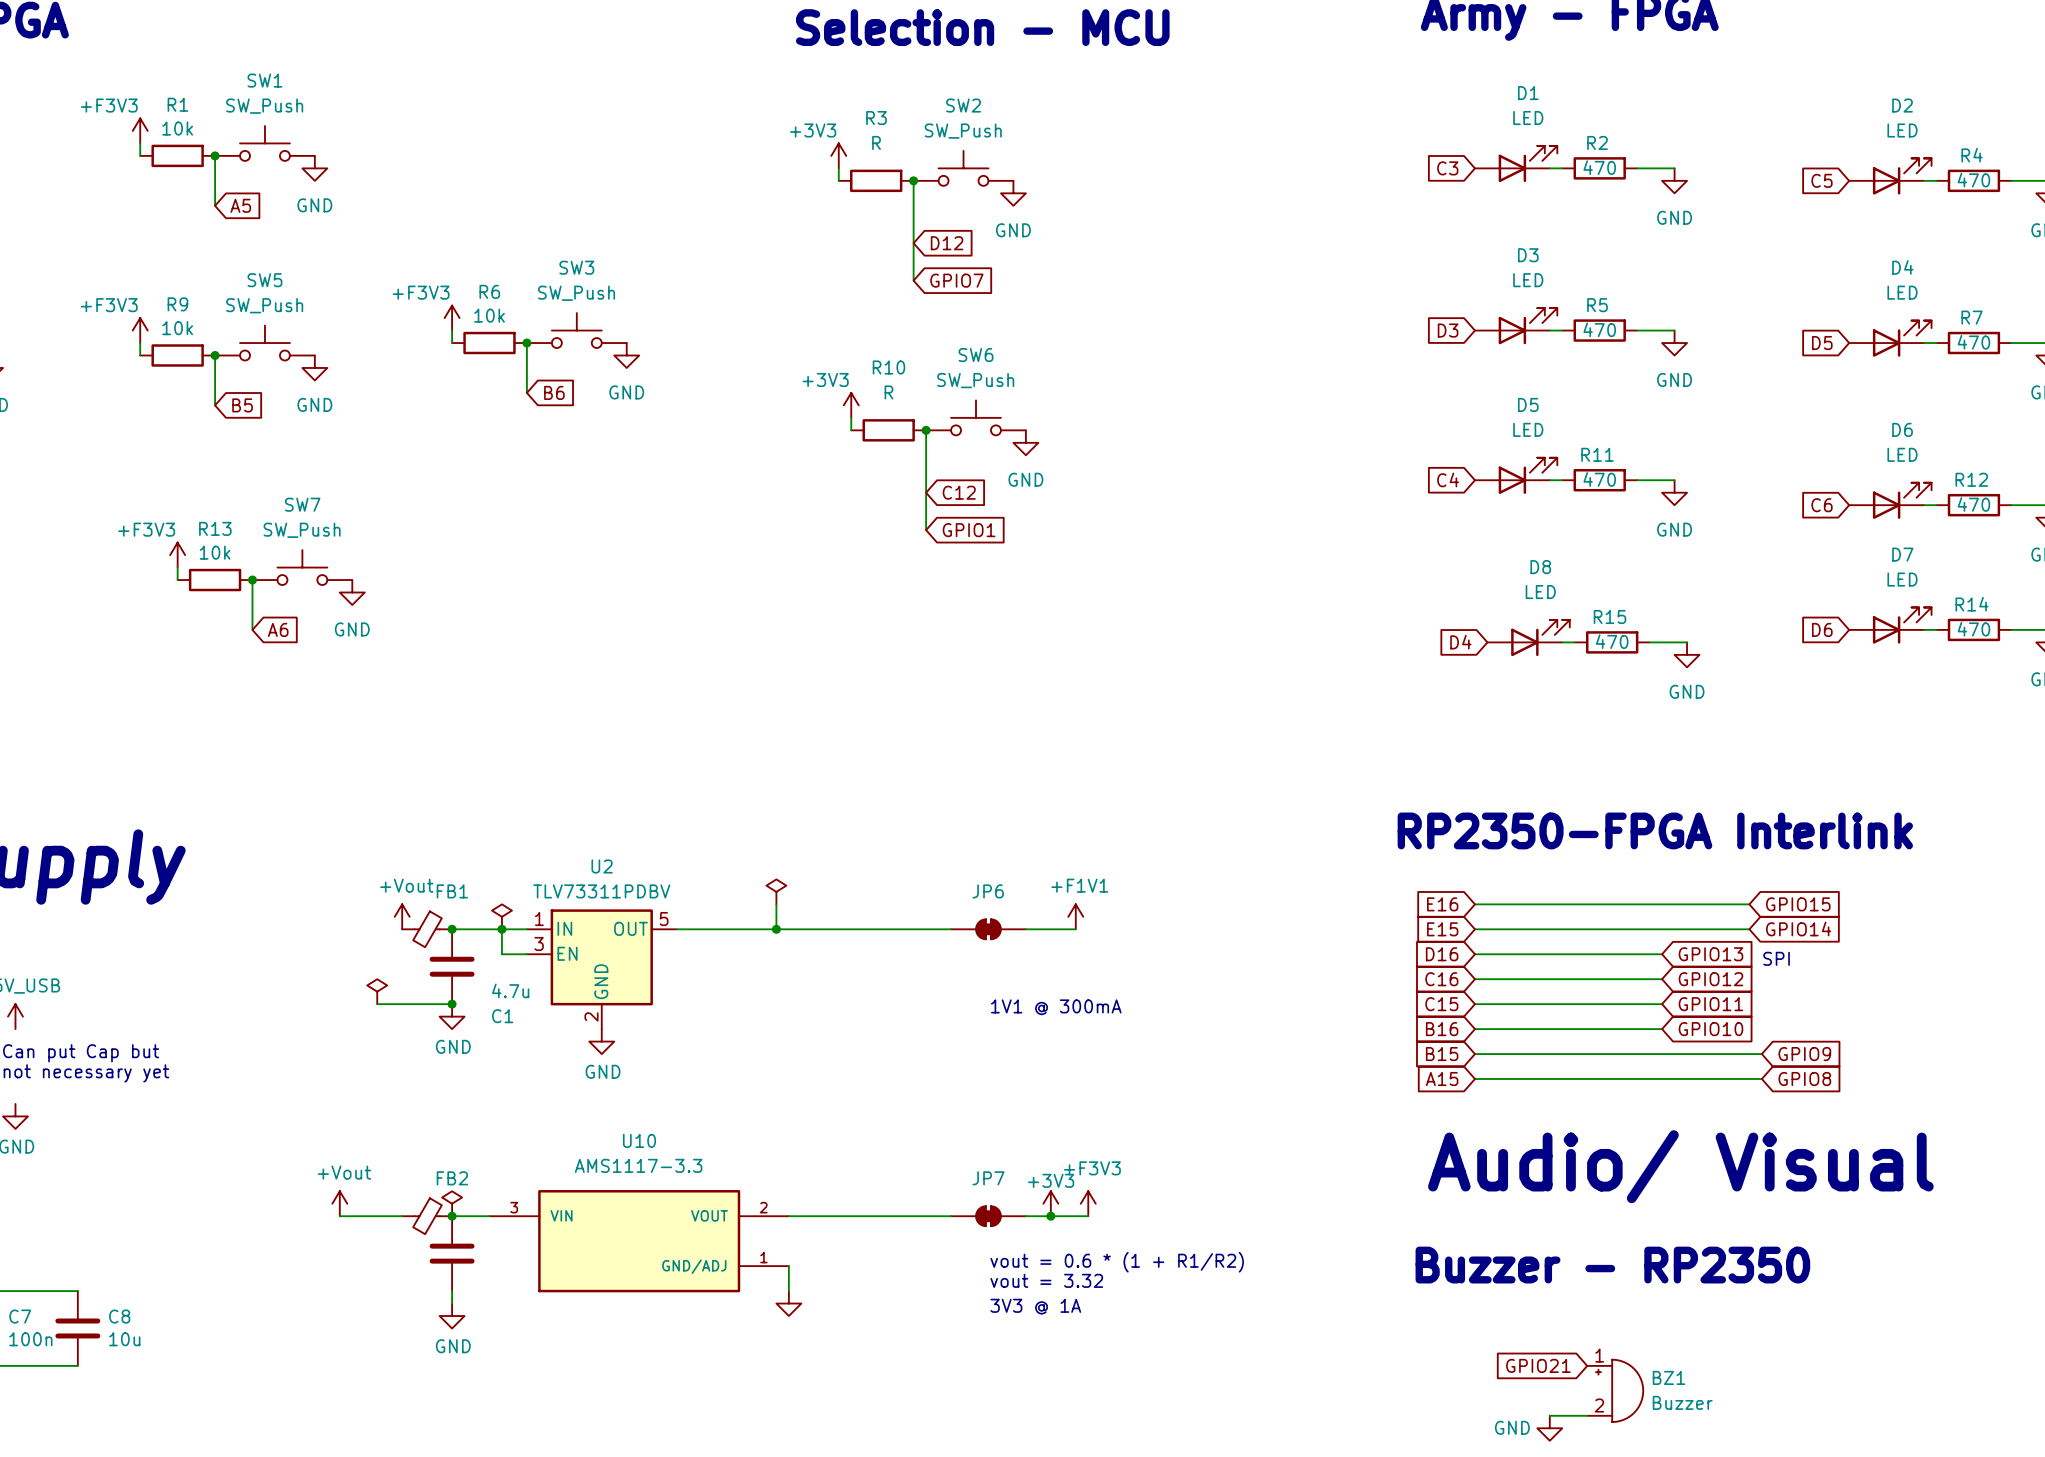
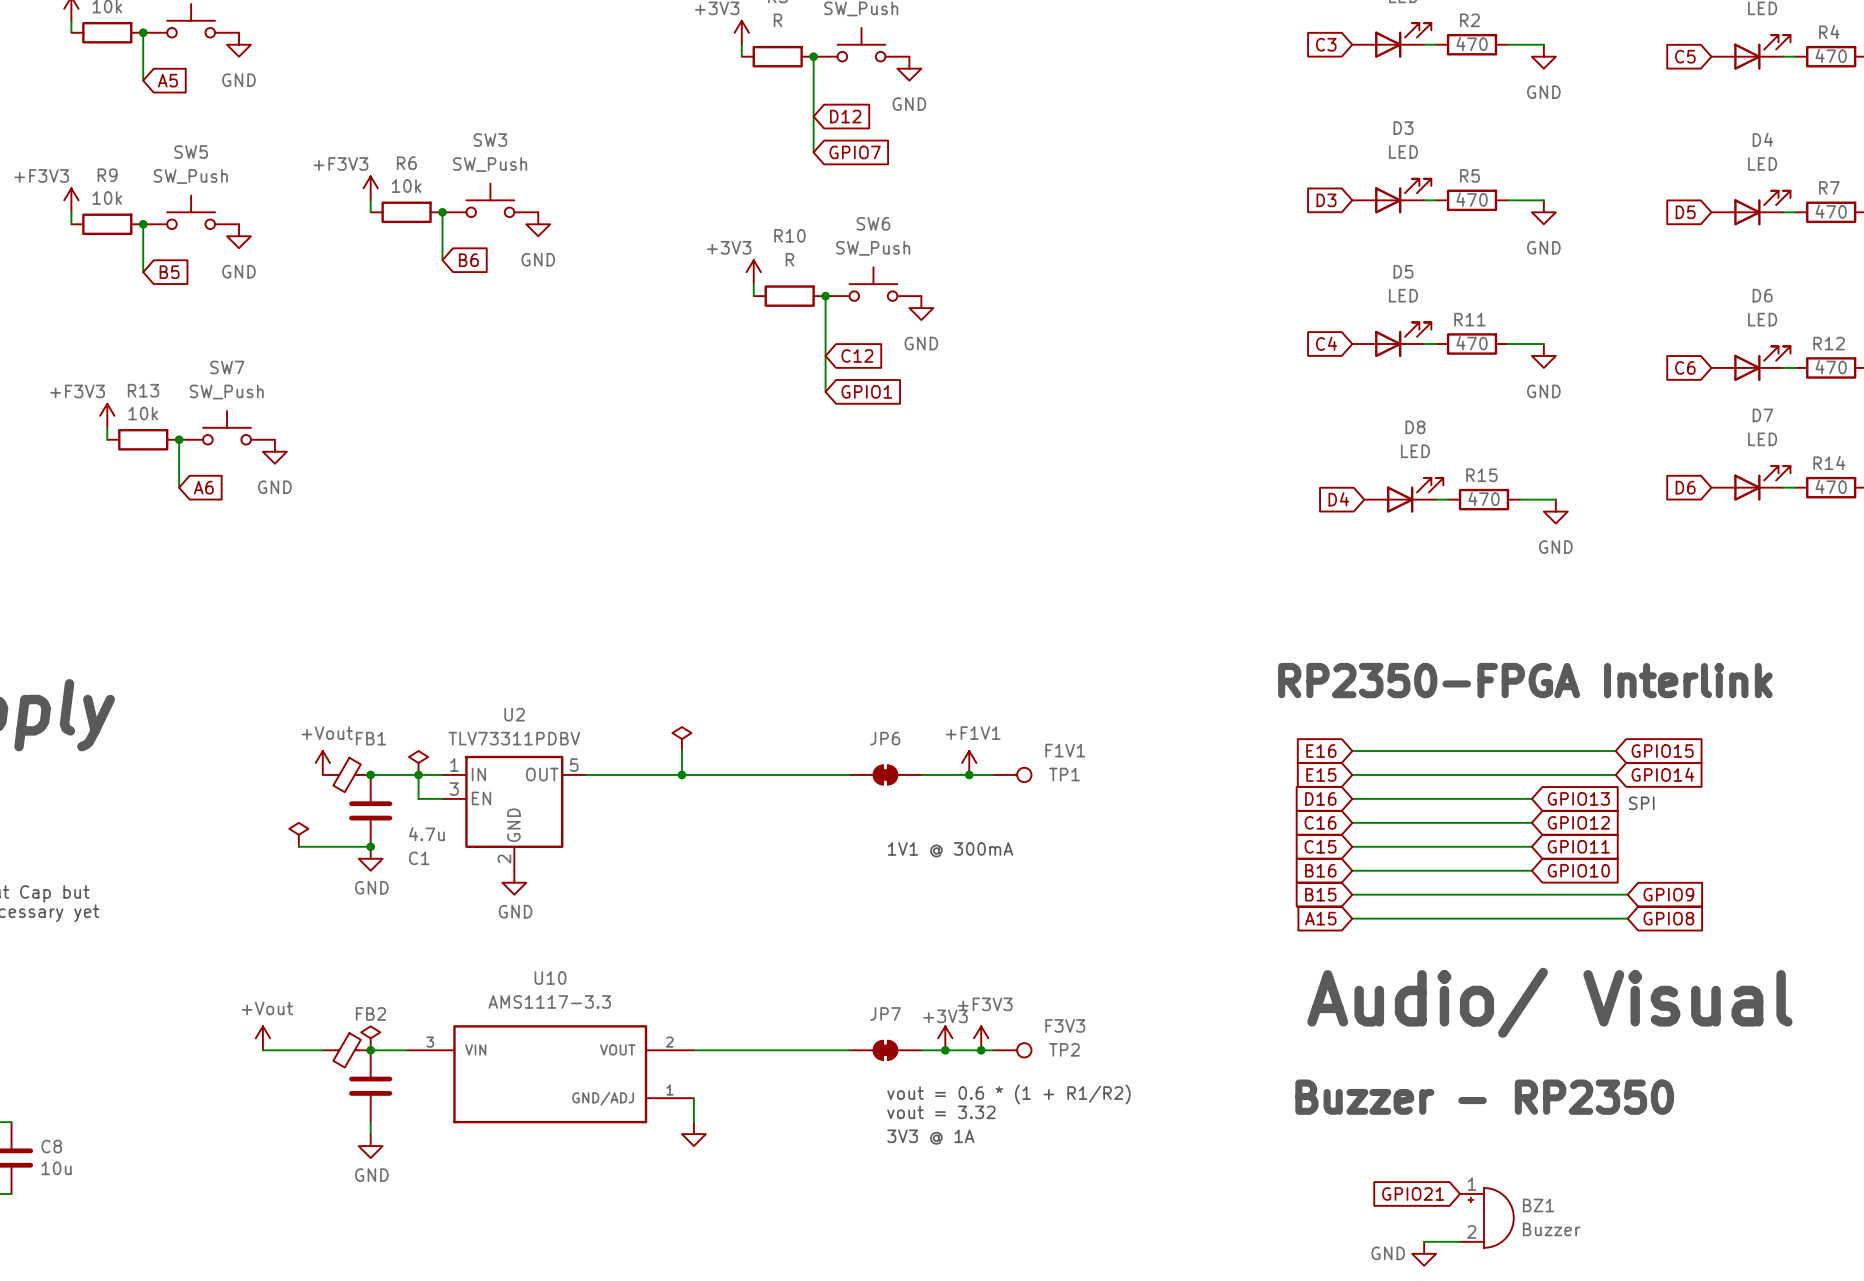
wire: none -> (969, 774) (993, 774)
junction: none -> (969, 774)
TP1: none -> F1V1 (1012, 774)
wire: none -> (981, 1050) (993, 1050)
junction: none -> (981, 1050)
TP2: none -> F3V3 (1012, 1050)

